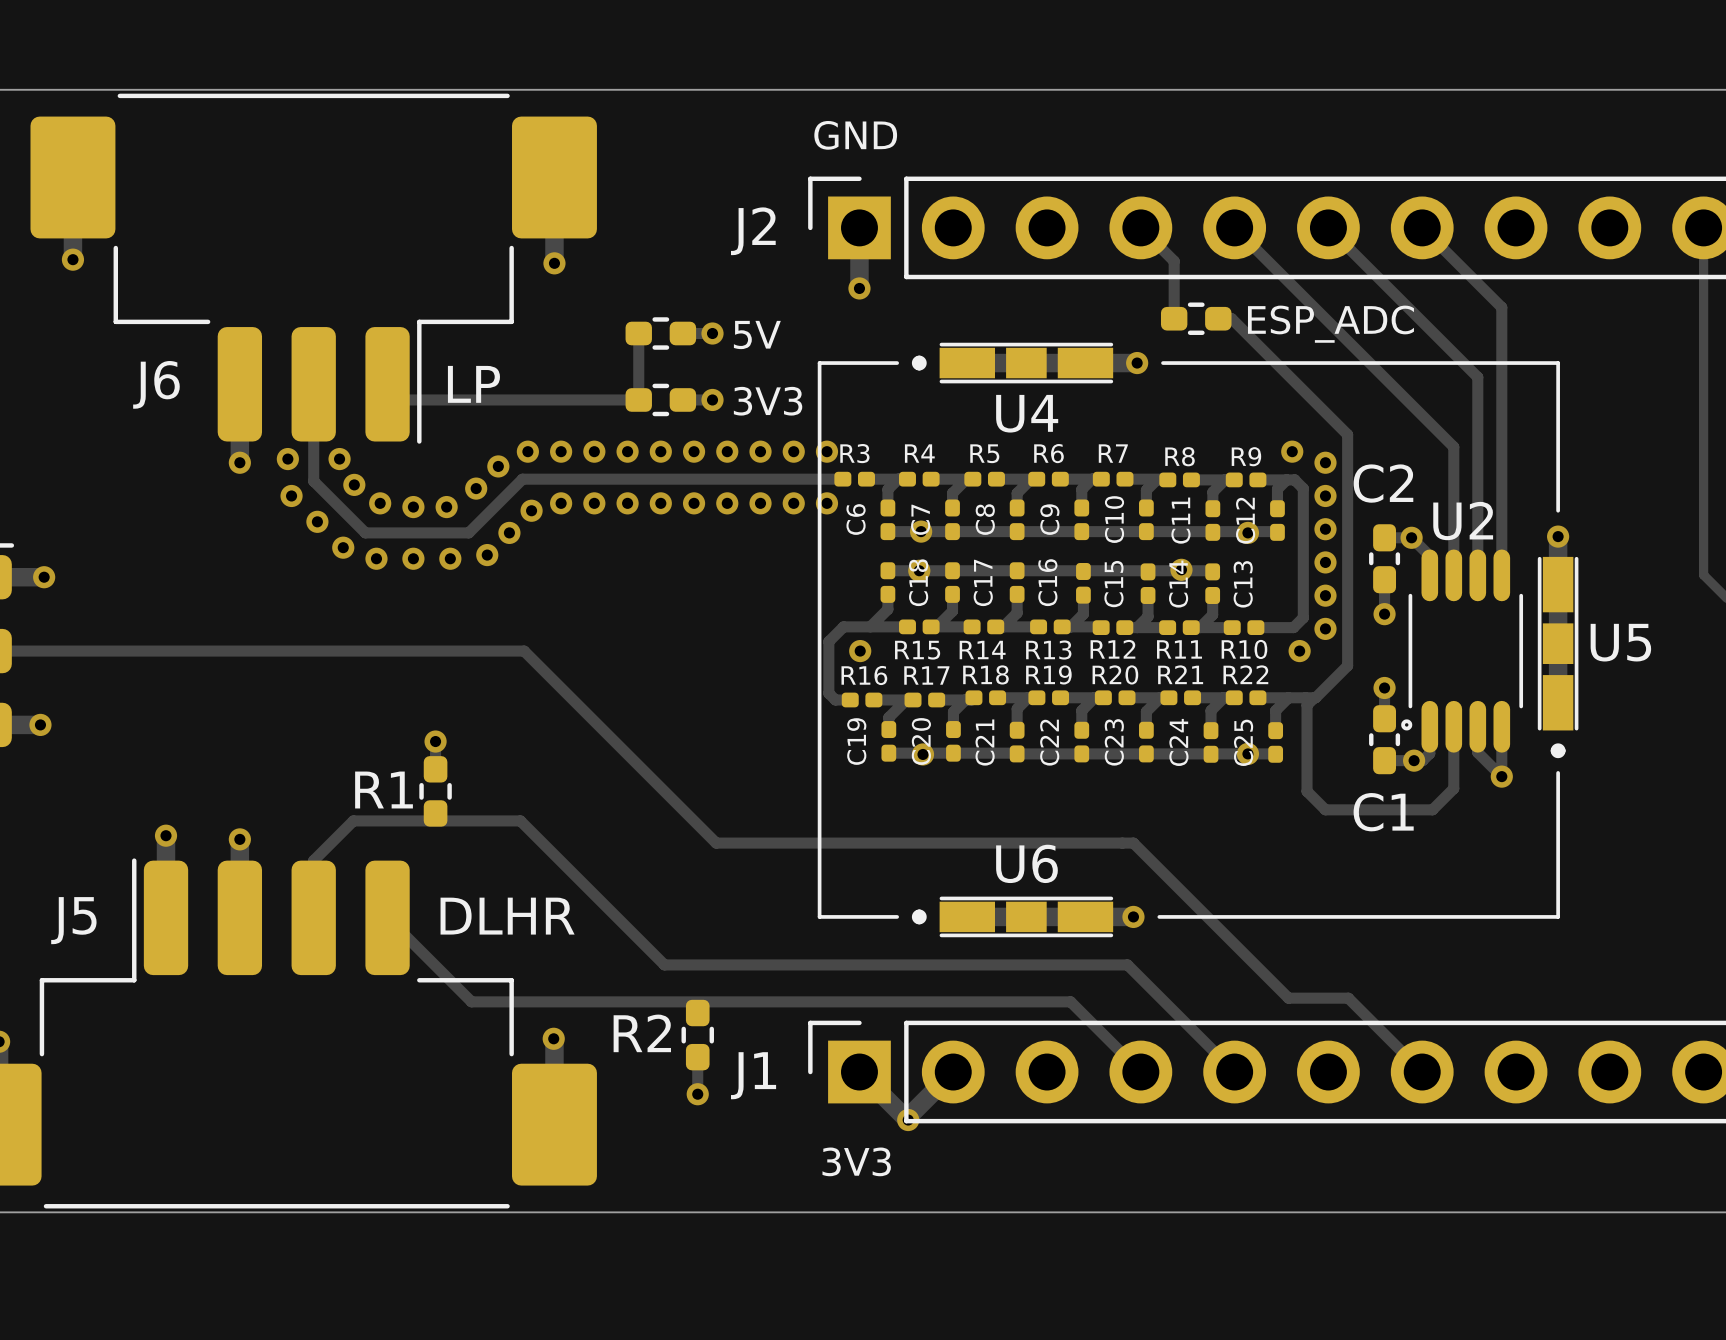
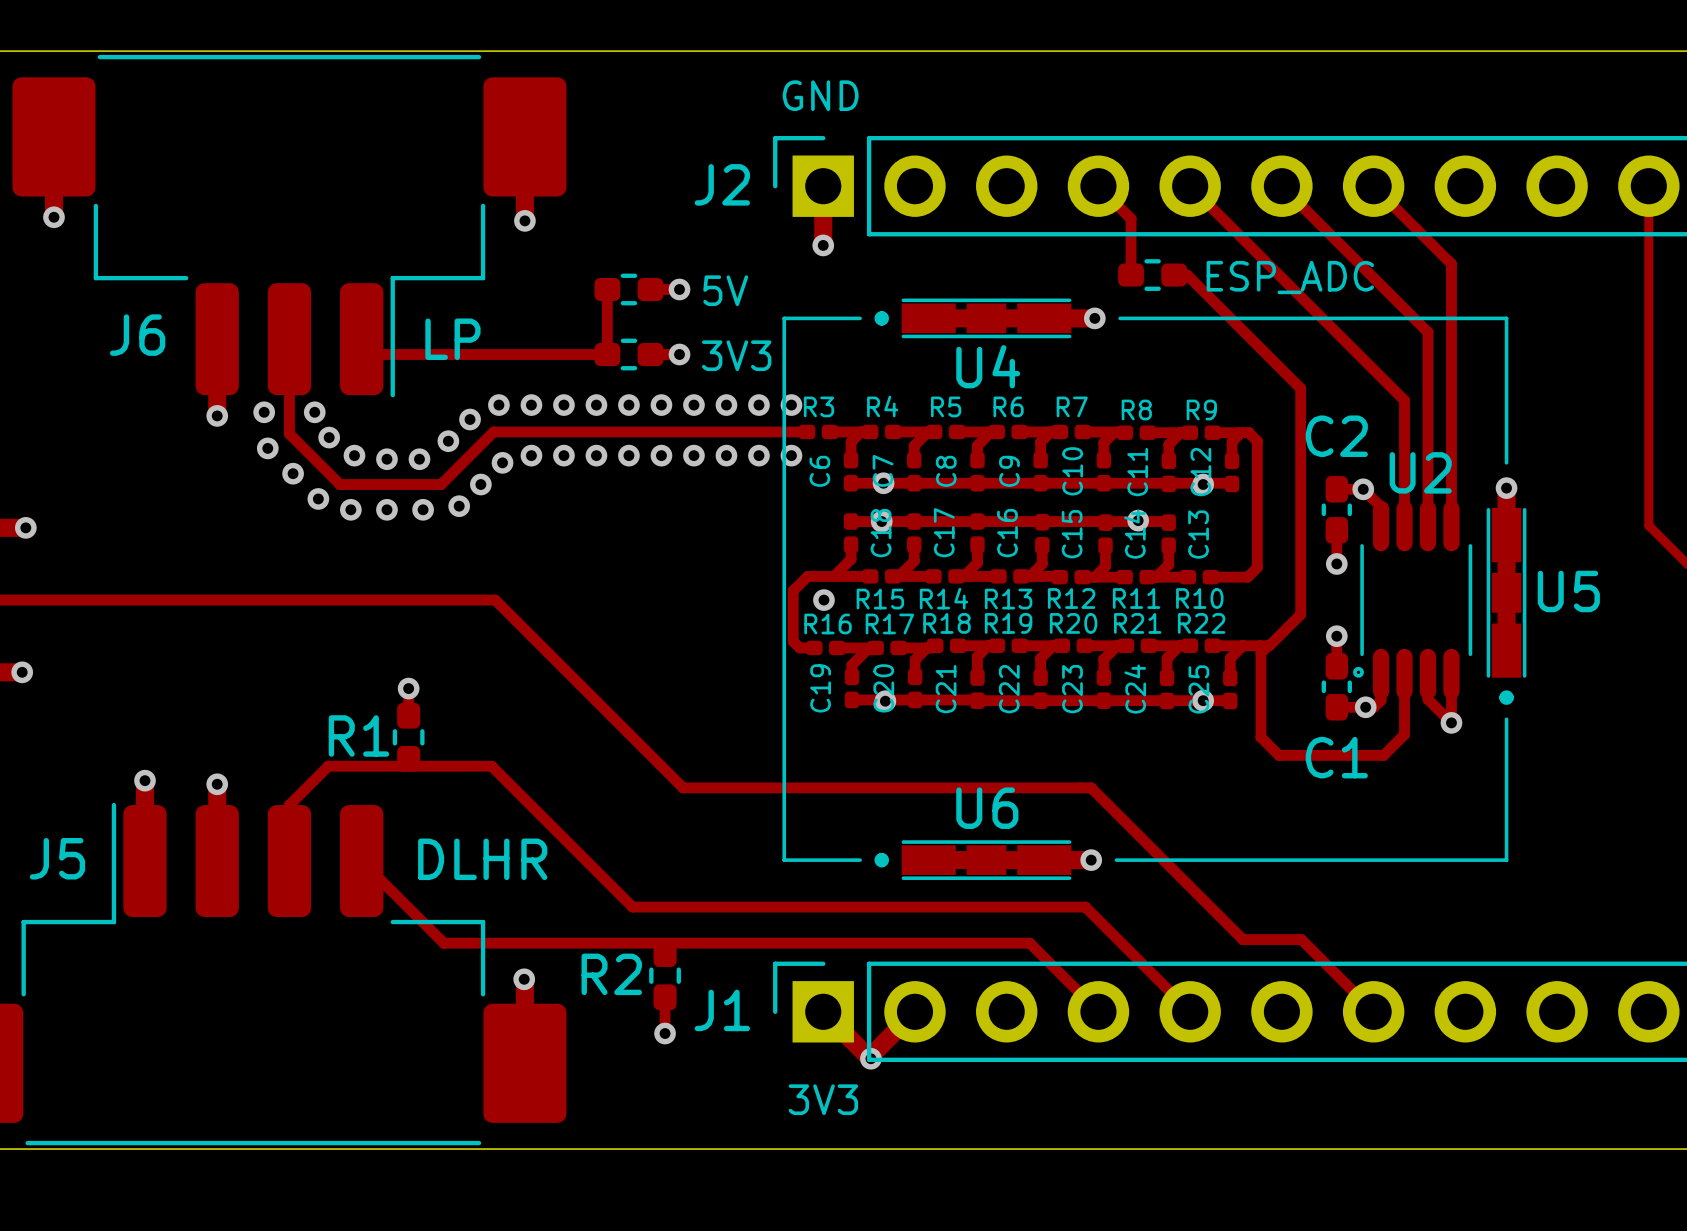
via: (1292, 451) -> none
via: (1325, 462) -> none
via: (1325, 495) -> none
via: (1325, 529) -> none
via: (1325, 562) -> none
via: (1325, 595) -> none
via: (1325, 628) -> none
via: (1299, 651) -> none

